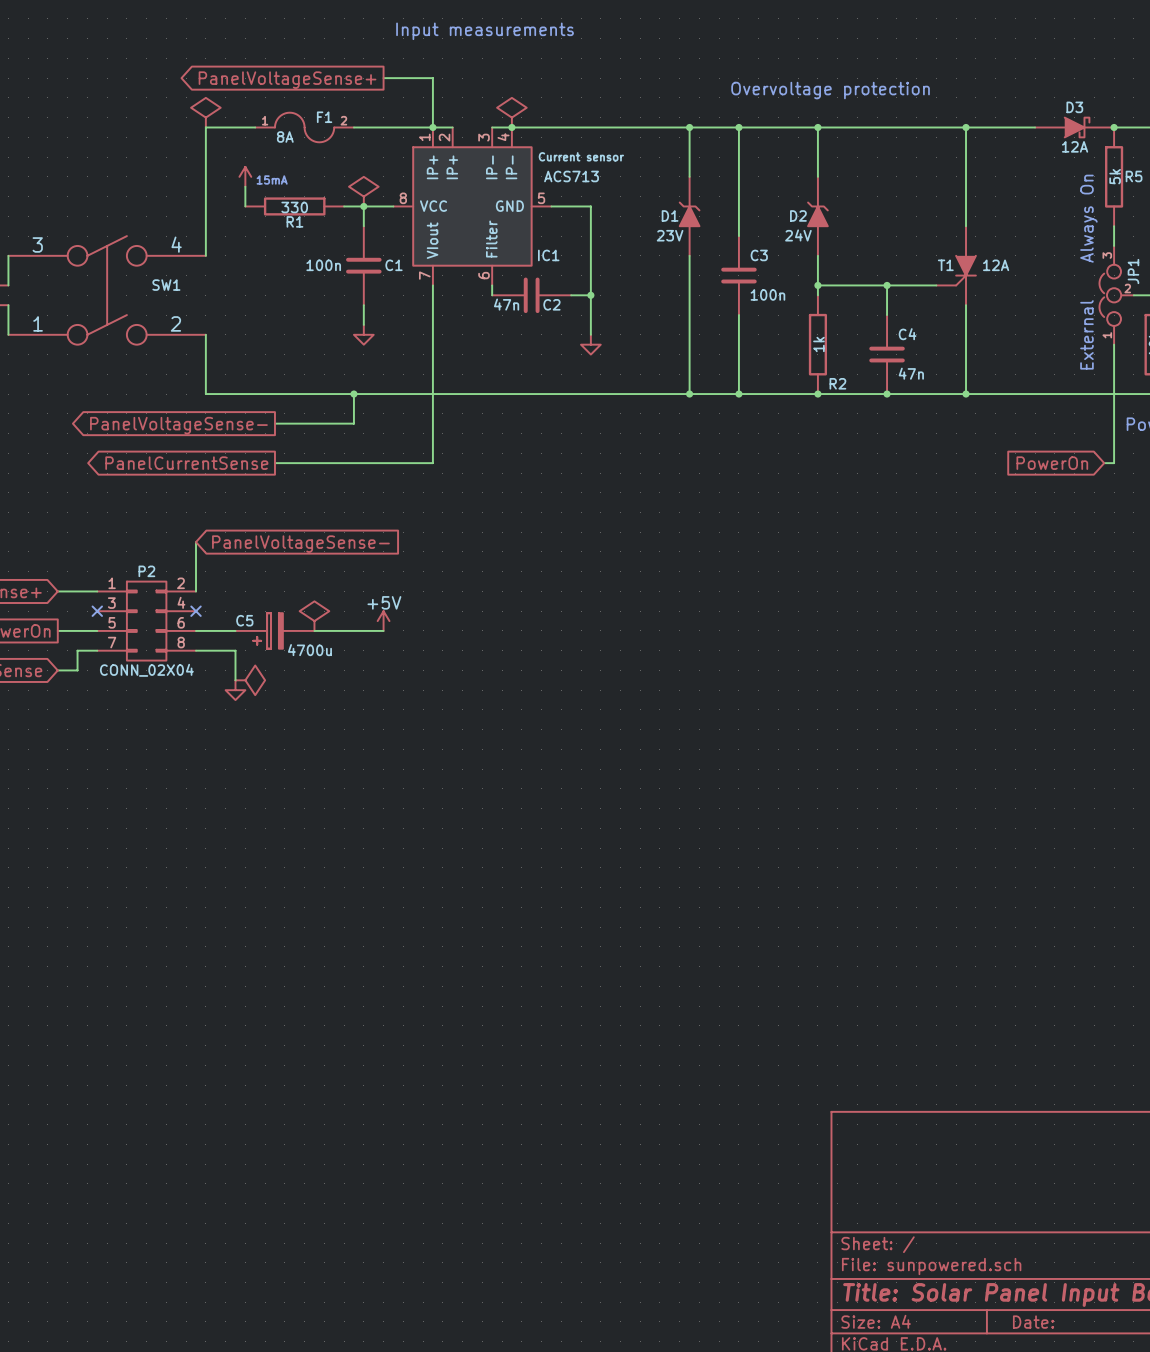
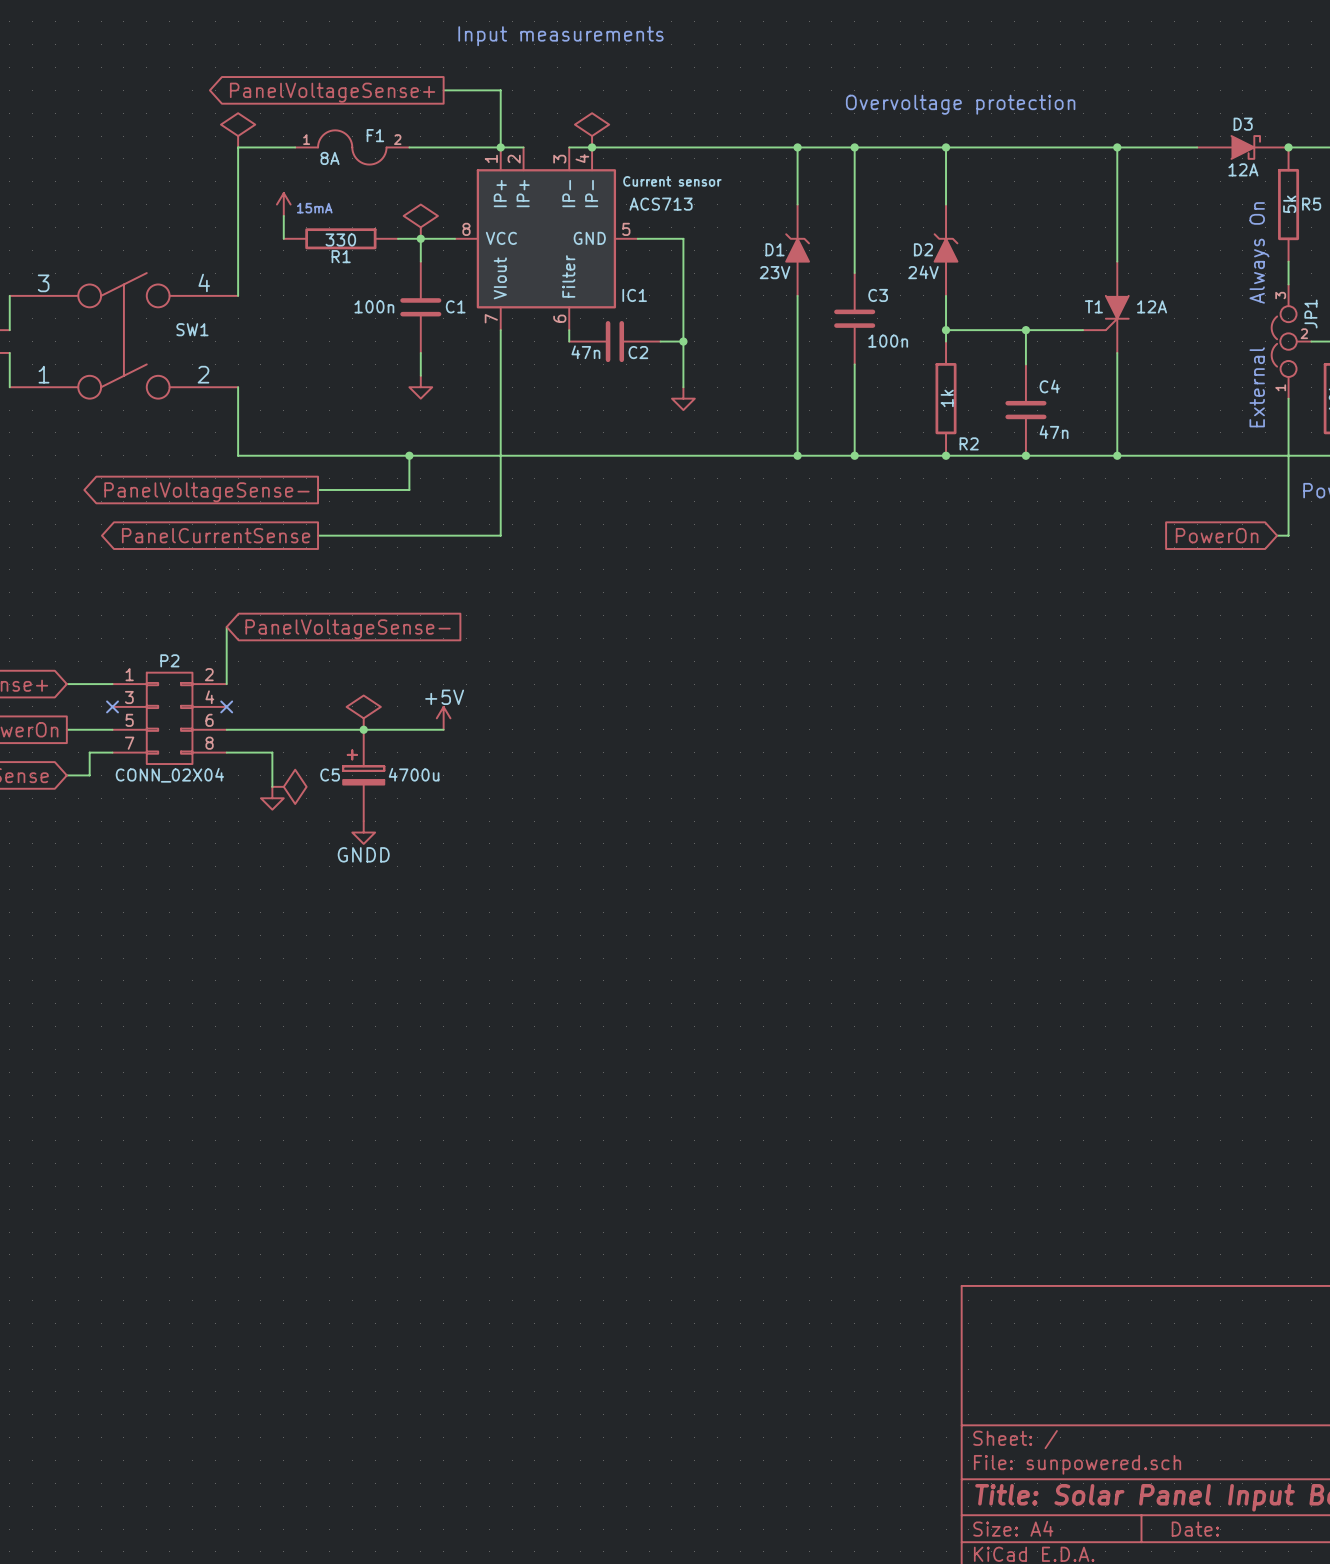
C5 rotation: 0° (268, 630) -> 90° clockwise (363, 767)
C5 position: (274, 630) -> (363, 775)
junction: none -> (363, 729)
C5 value position: 4700u (309, 650) -> 4700u (414, 774)
power symbol: none -> GNDD (363, 832)

